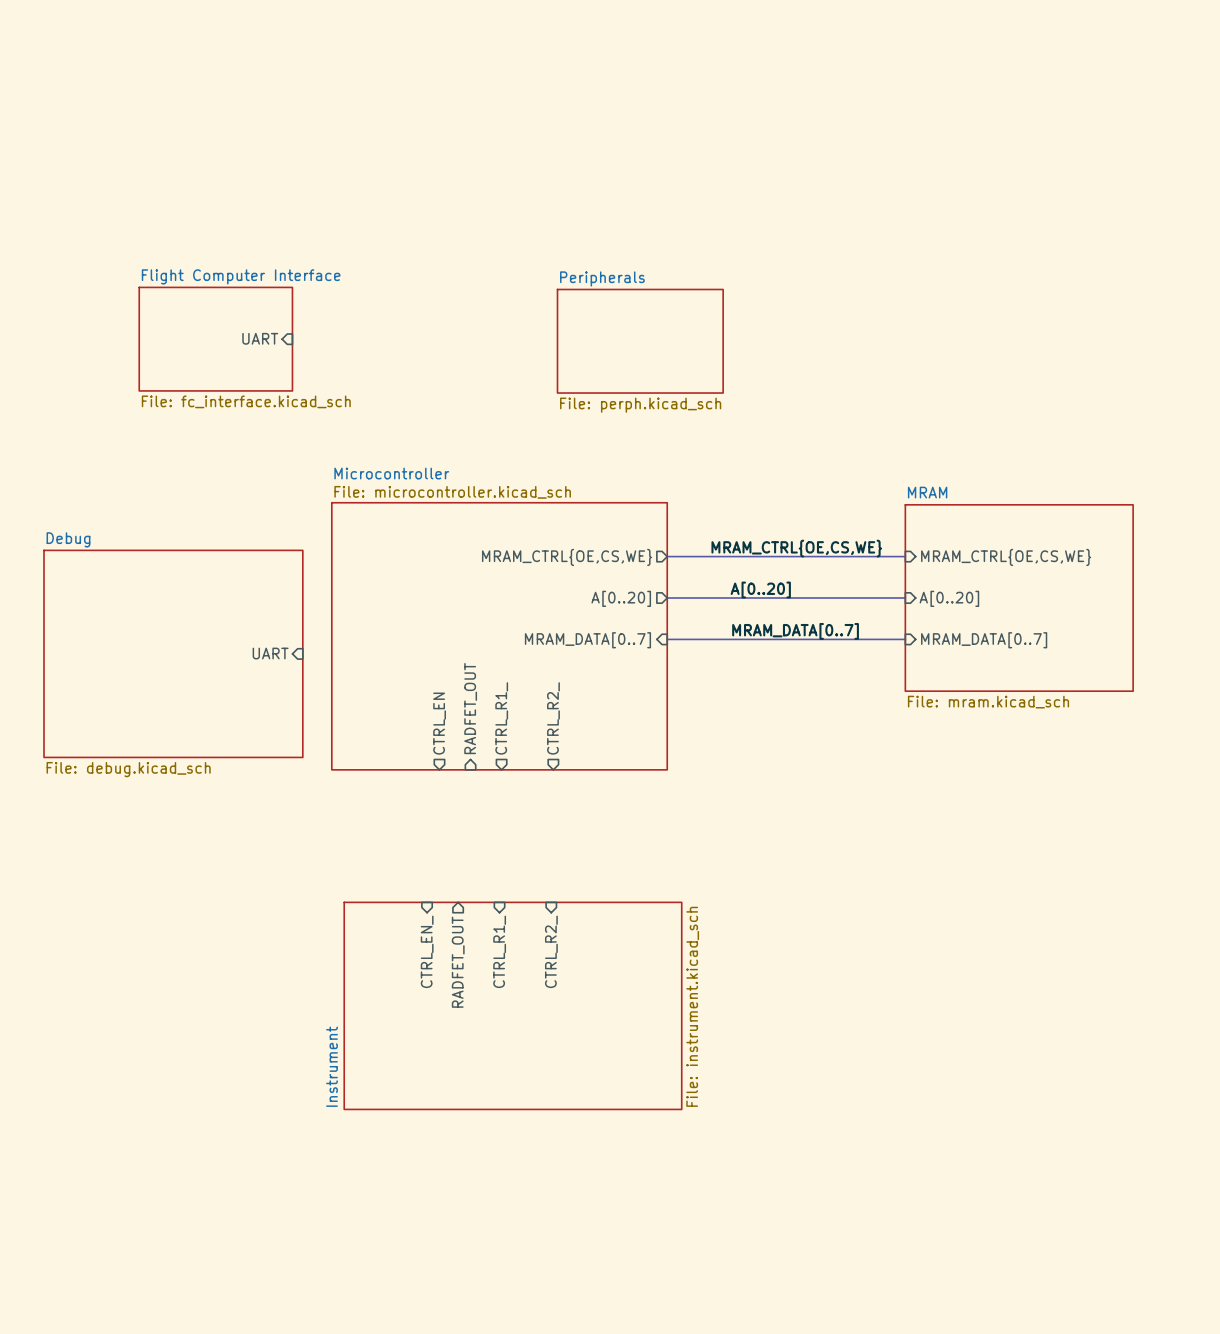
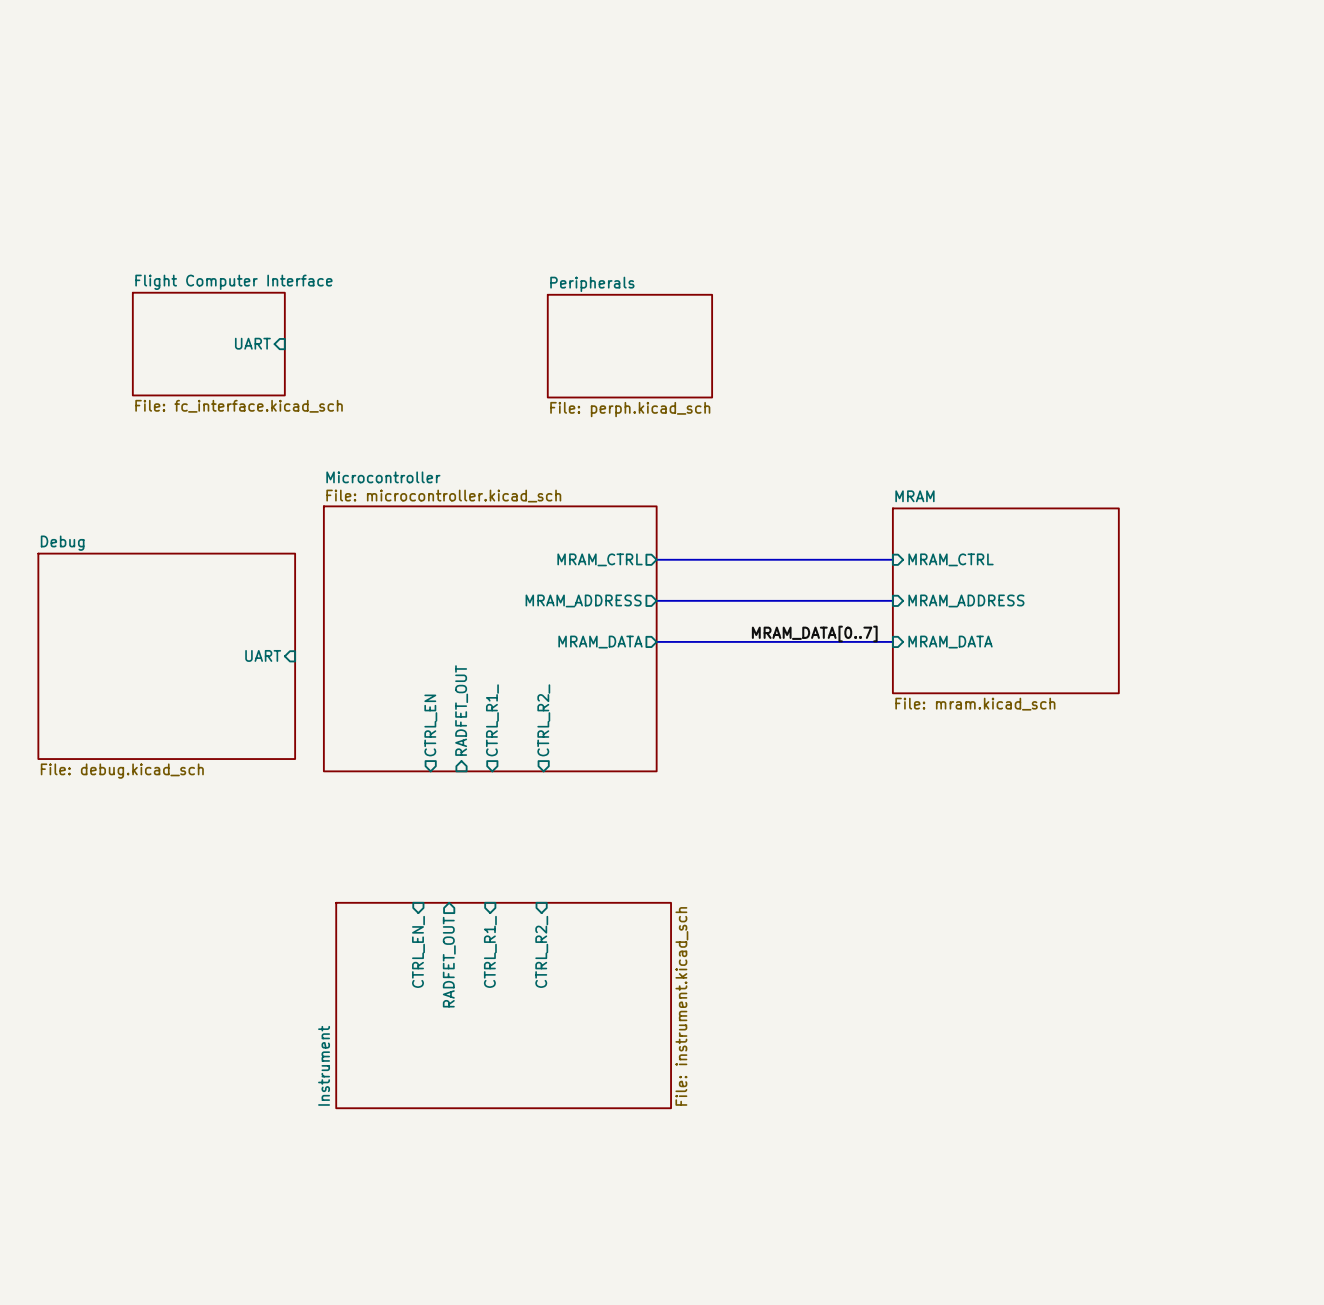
label: MRAM_CTRL{OE,CS,WE} (796, 548) -> none
sheet pin: MRAM_CTRL{OE,CS,WE} (567, 557) -> MRAM_CTRL (600, 559)
sheet pin: MRAM_CTRL{OE,CS,WE} (1006, 557) -> MRAM_CTRL (951, 559)
label: A[0..20] (760, 589) -> none
sheet pin: A[0..20] (621, 598) -> MRAM_ADDRESS (583, 600)
sheet pin: A[0..20] (949, 598) -> MRAM_ADDRESS (966, 600)
label position: MRAM_DATA[0..7] (795, 631) -> MRAM_DATA[0..7] (814, 634)
sheet pin shape: input (587, 640) -> output (600, 642)
sheet pin: MRAM_DATA[0..7] (587, 640) -> MRAM_DATA (600, 642)
sheet pin: MRAM_DATA[0..7] (984, 640) -> MRAM_DATA (950, 642)

